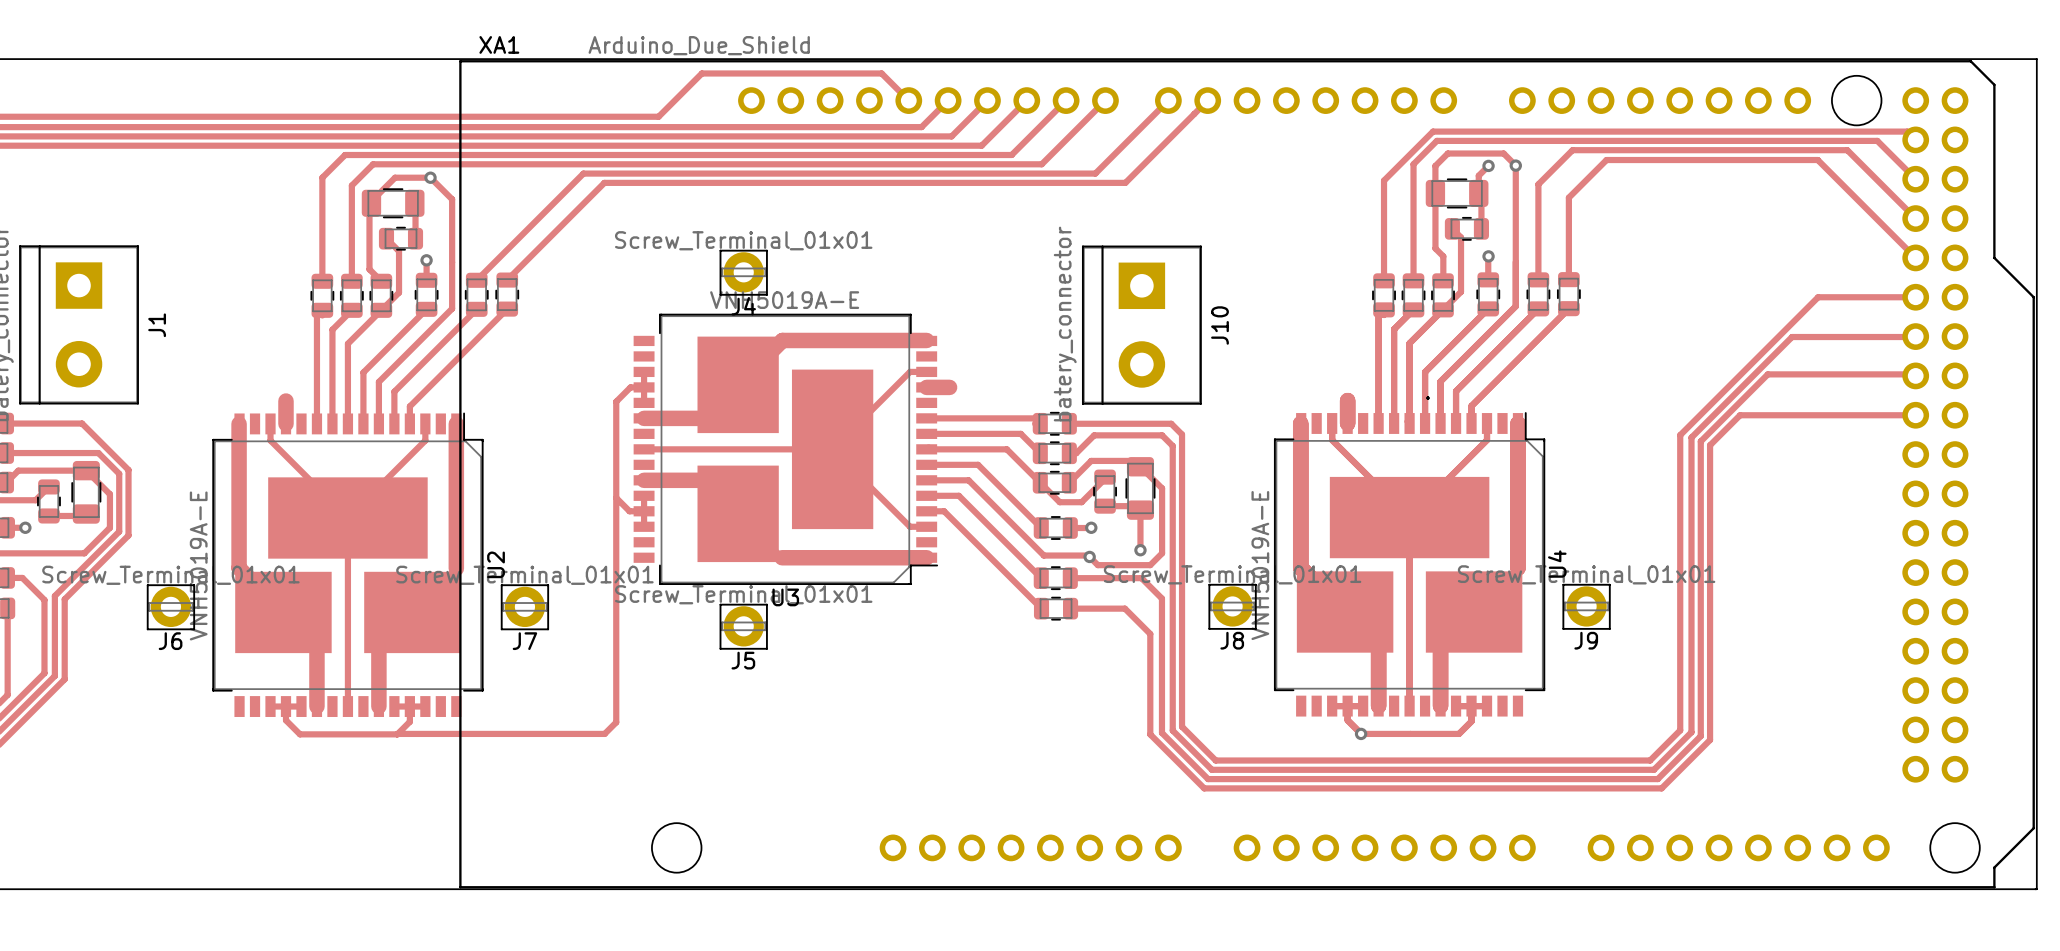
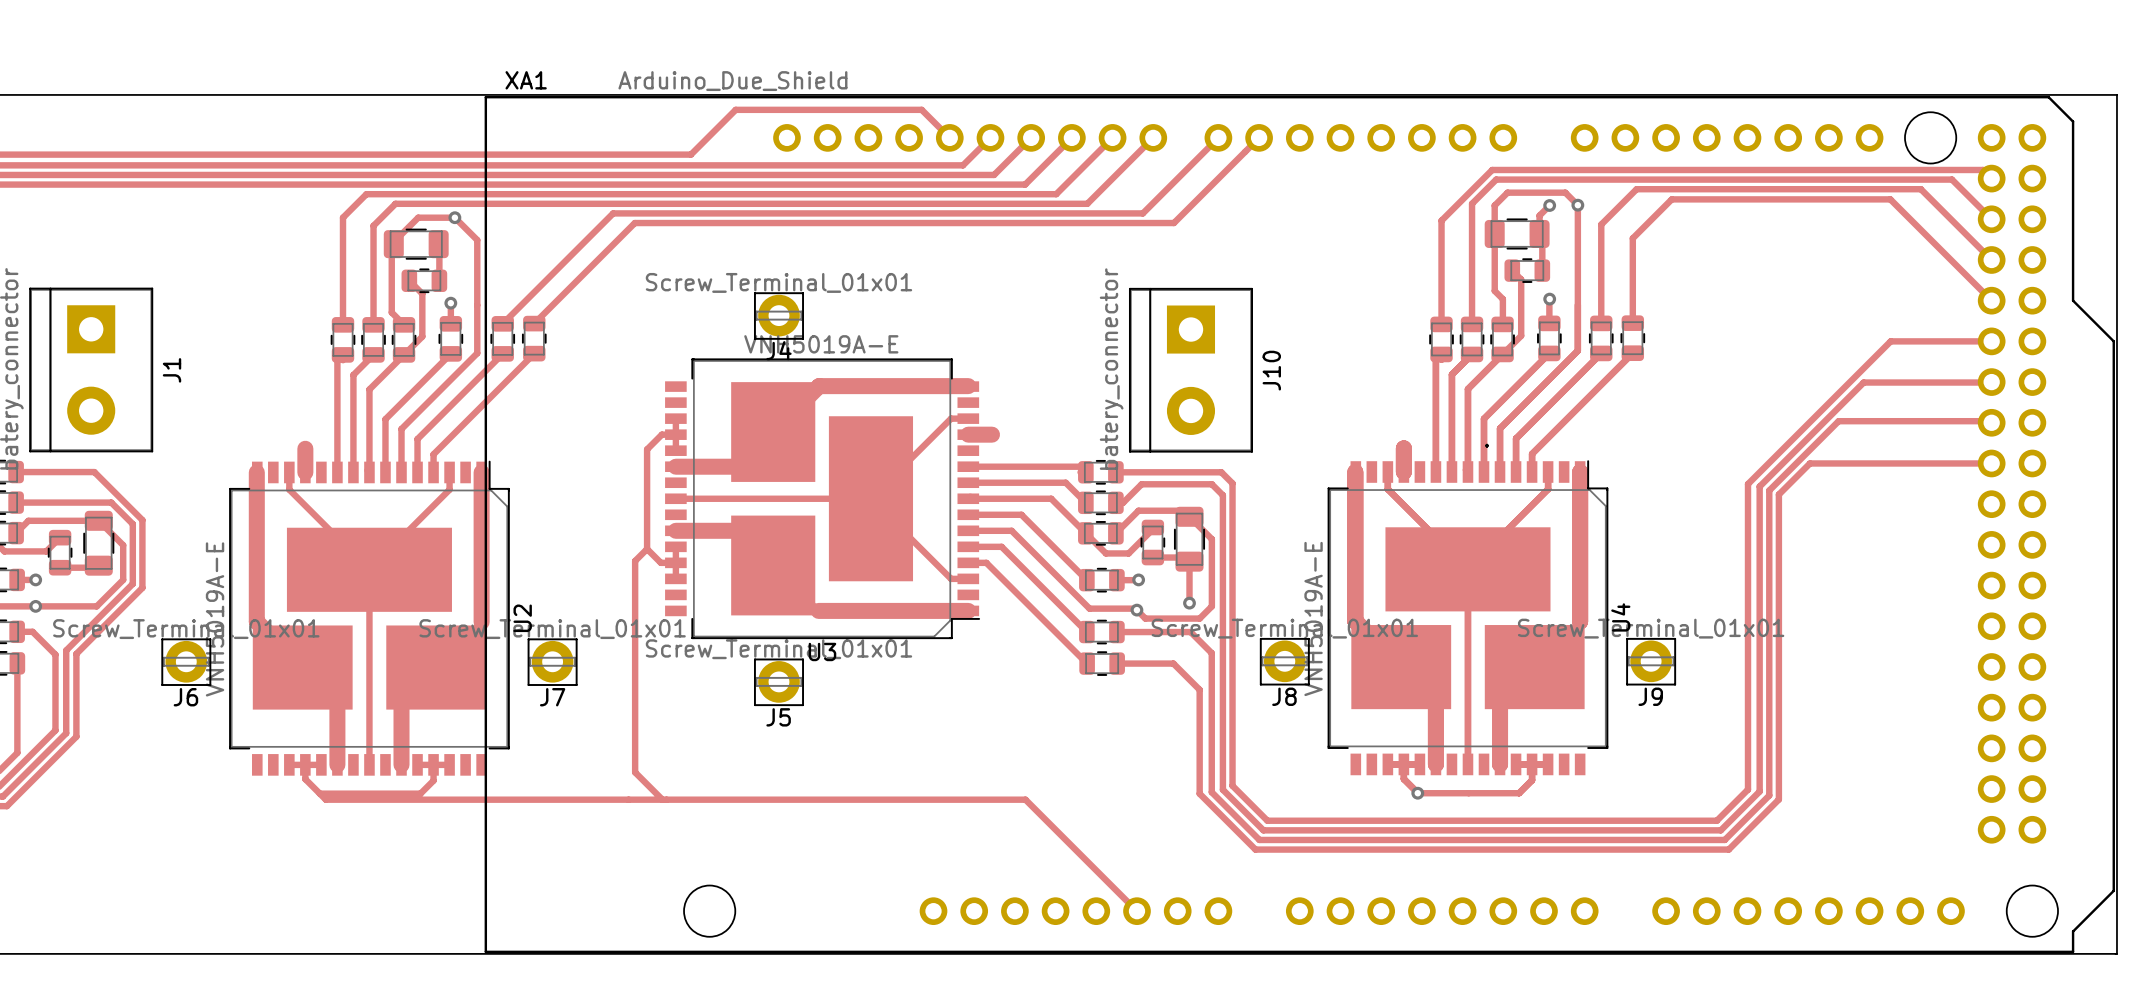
track: (616, 497) (616, 722) (604, 733) (397, 733) -> (647, 549) (635, 560) (635, 772) (662, 799)
via: none -> (35, 606)
track: none -> (319, 793) (325, 799) (1025, 799) (1137, 911)

